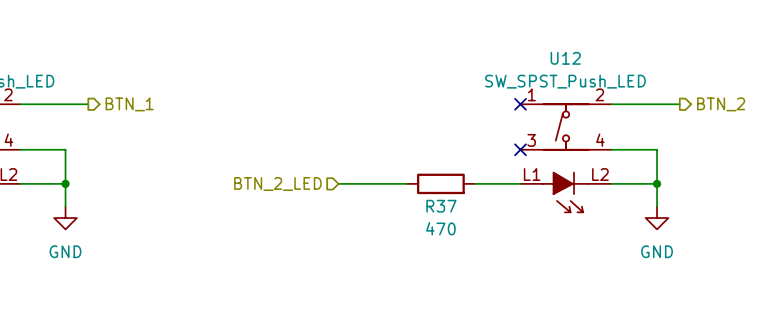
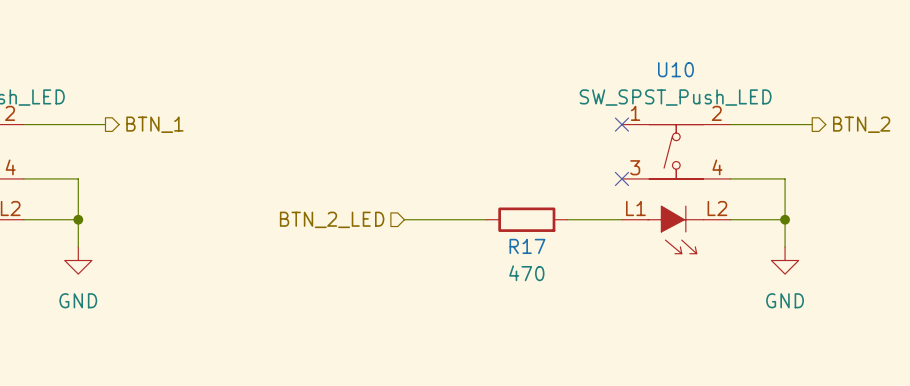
U12 name: U12 (565, 58) -> U10 (675, 69)
R37 name: R37 (441, 206) -> R17 (527, 246)

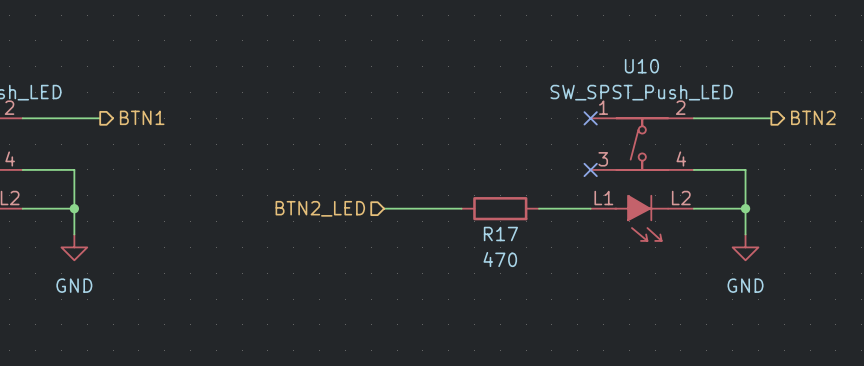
hierarchical label: BTN_1 (154, 124) -> BTN1 (142, 117)
hierarchical label: BTN_2 (861, 124) -> BTN2 (813, 117)
hierarchical label: BTN_2_LED (332, 219) -> BTN2_LED (320, 208)

